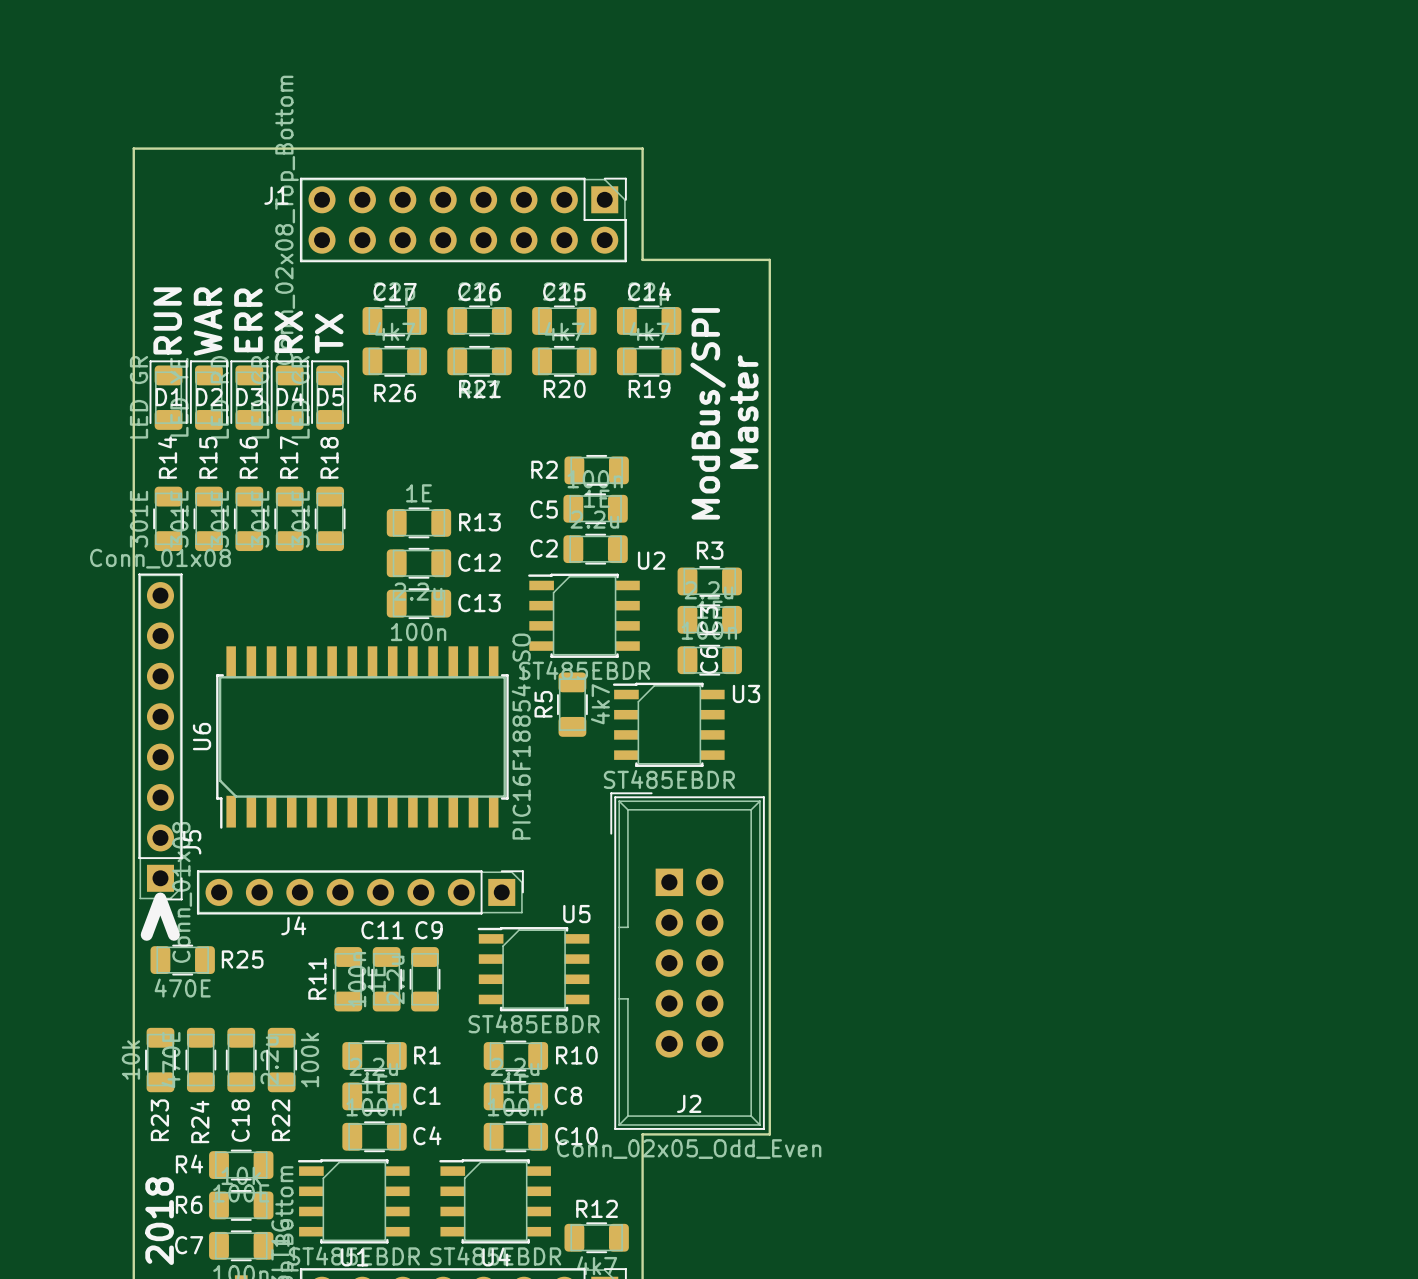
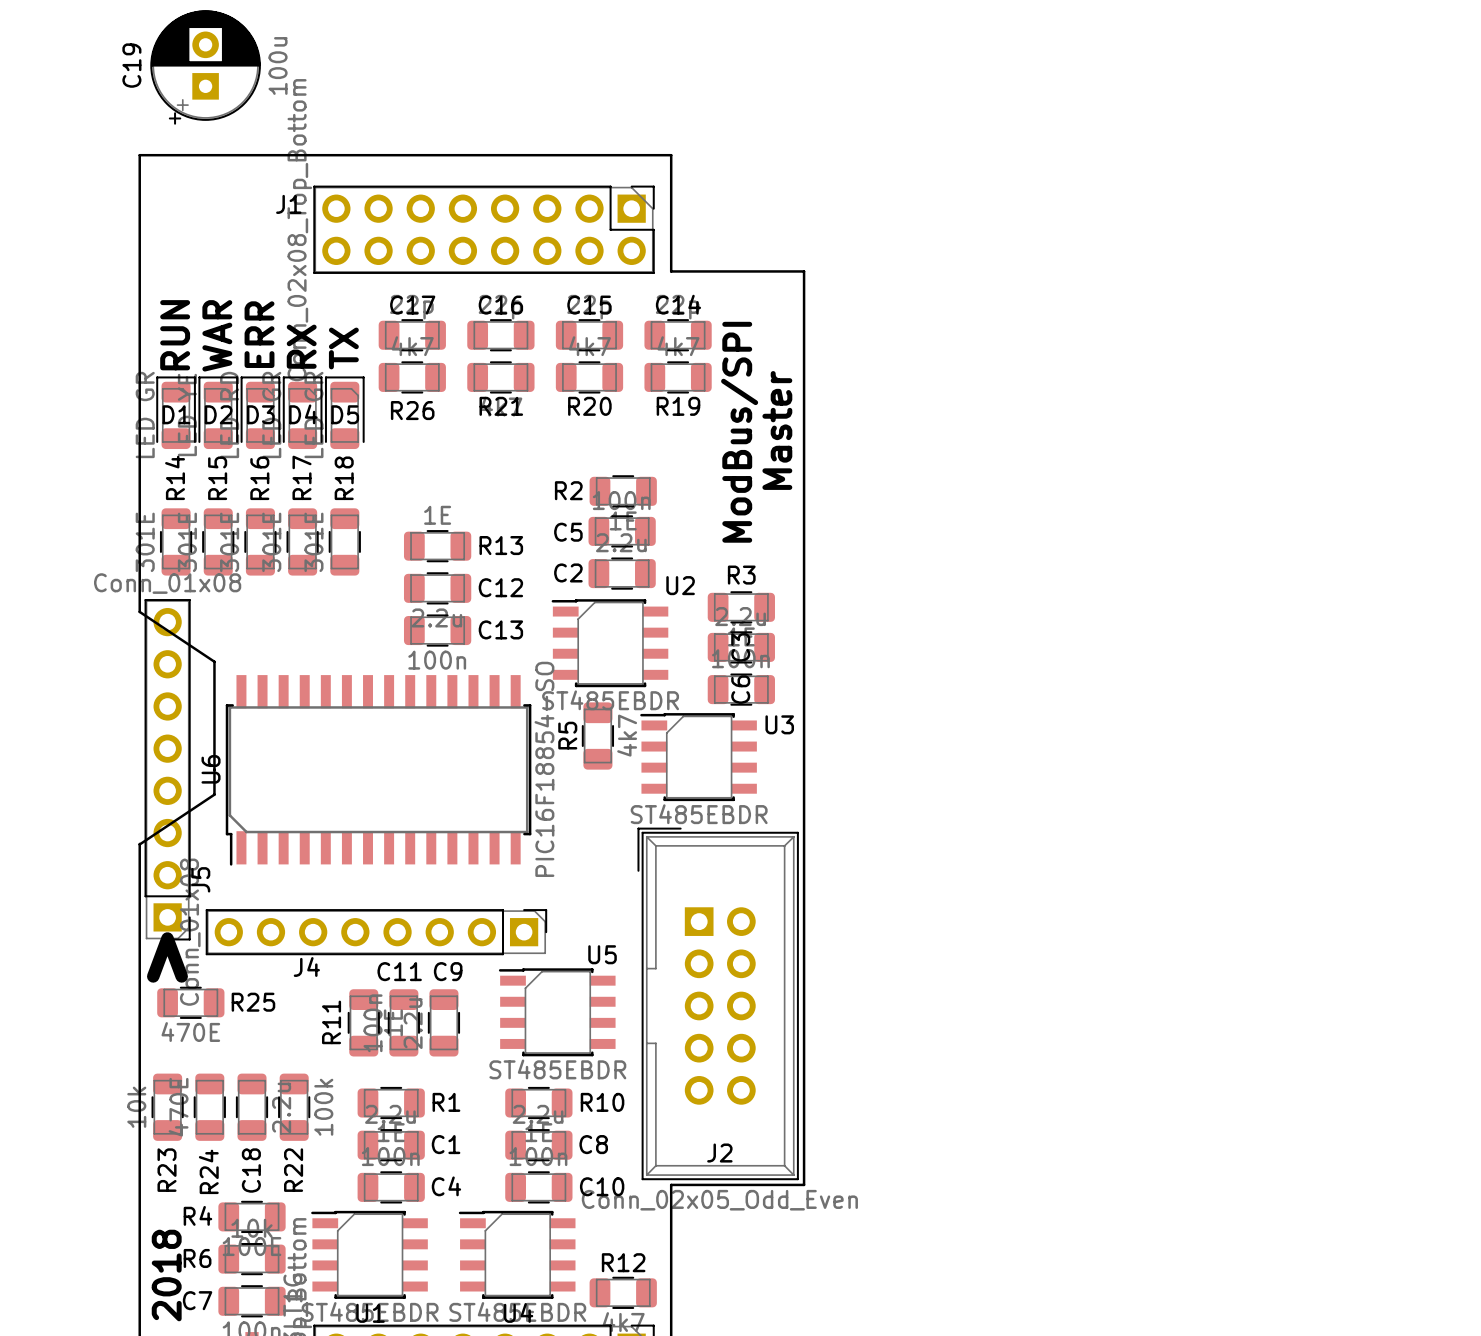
C19: none -> 100u (205, 67)
board edge: (133, 585) (133, 807) -> (139, 611) (214, 661) (214, 794) (139, 844)

